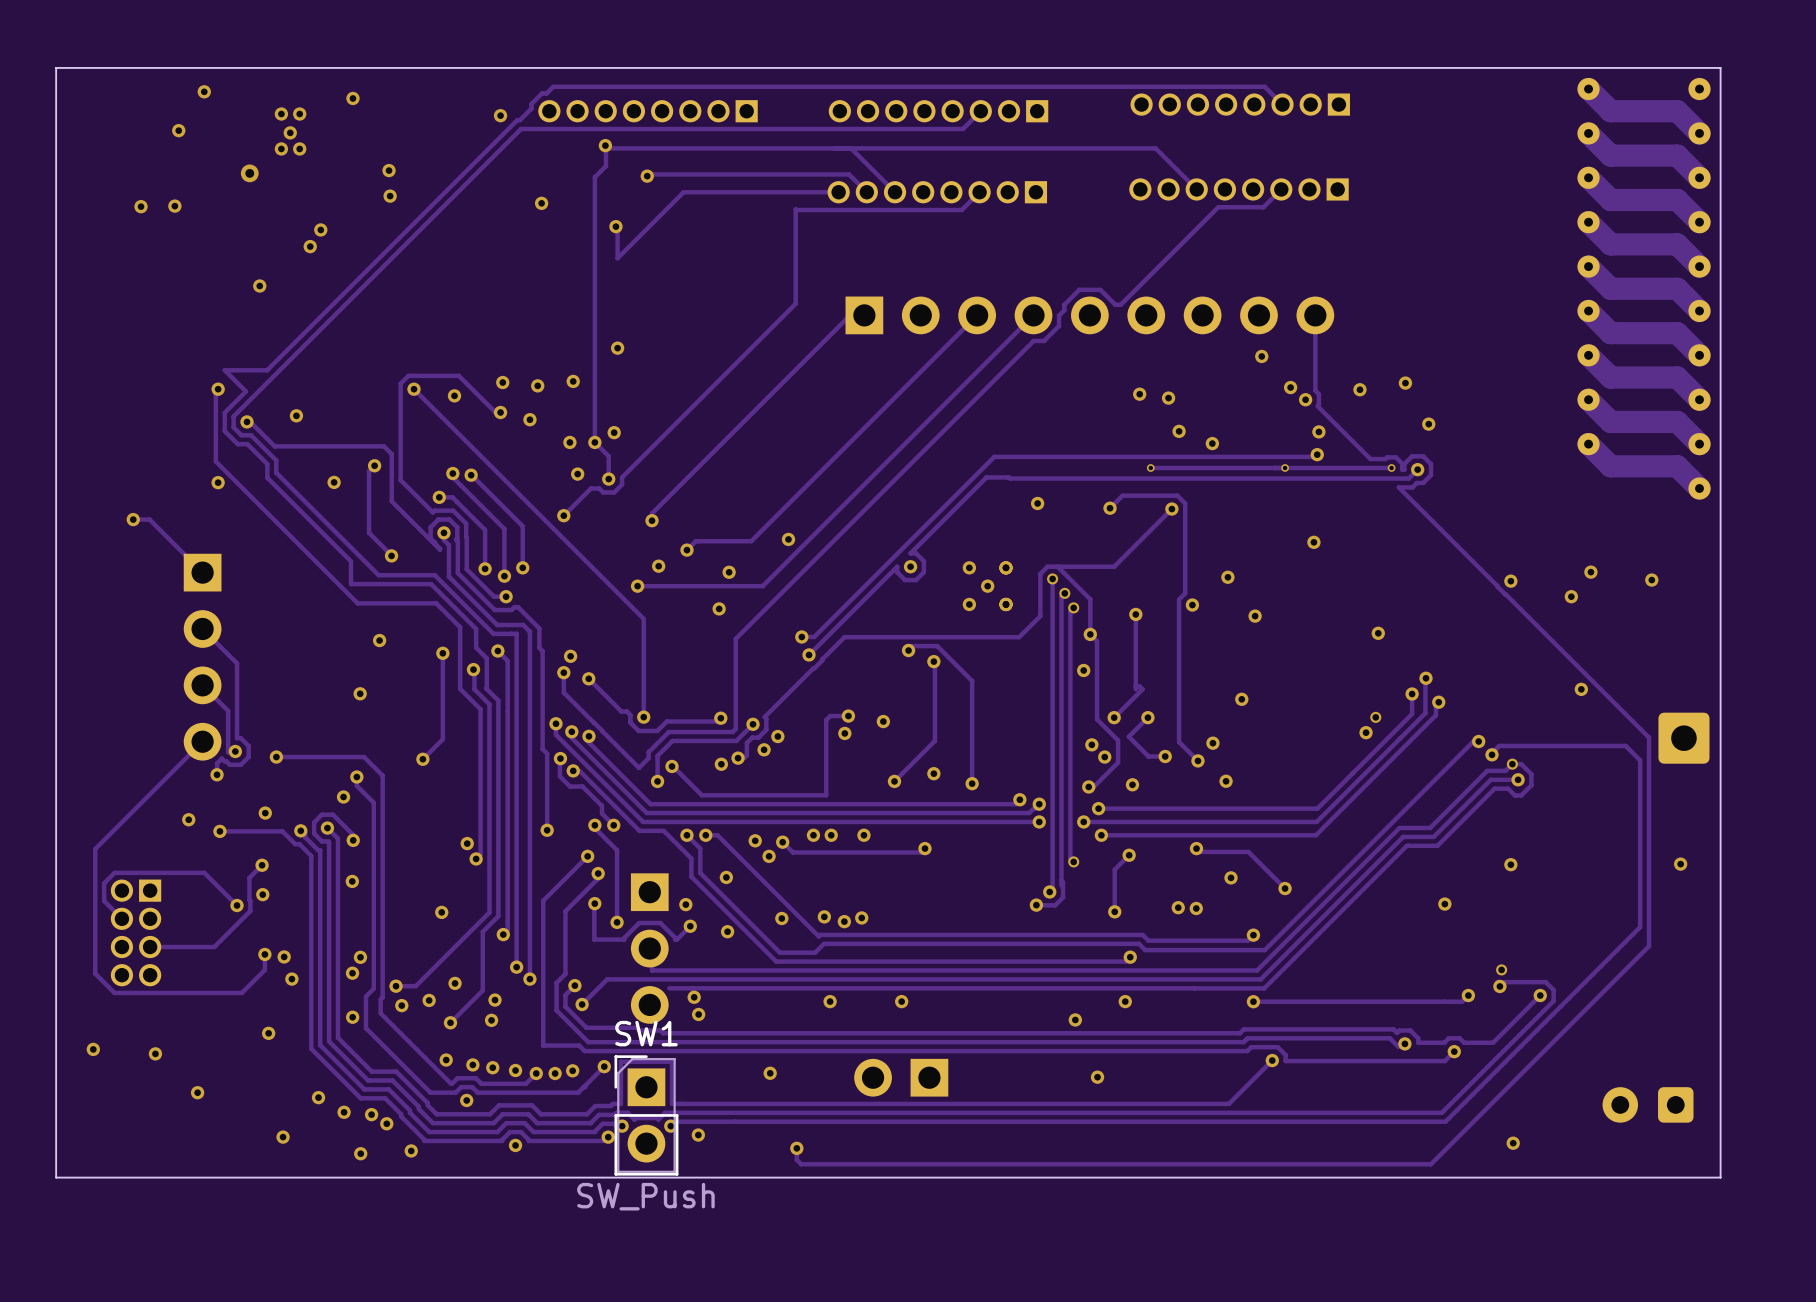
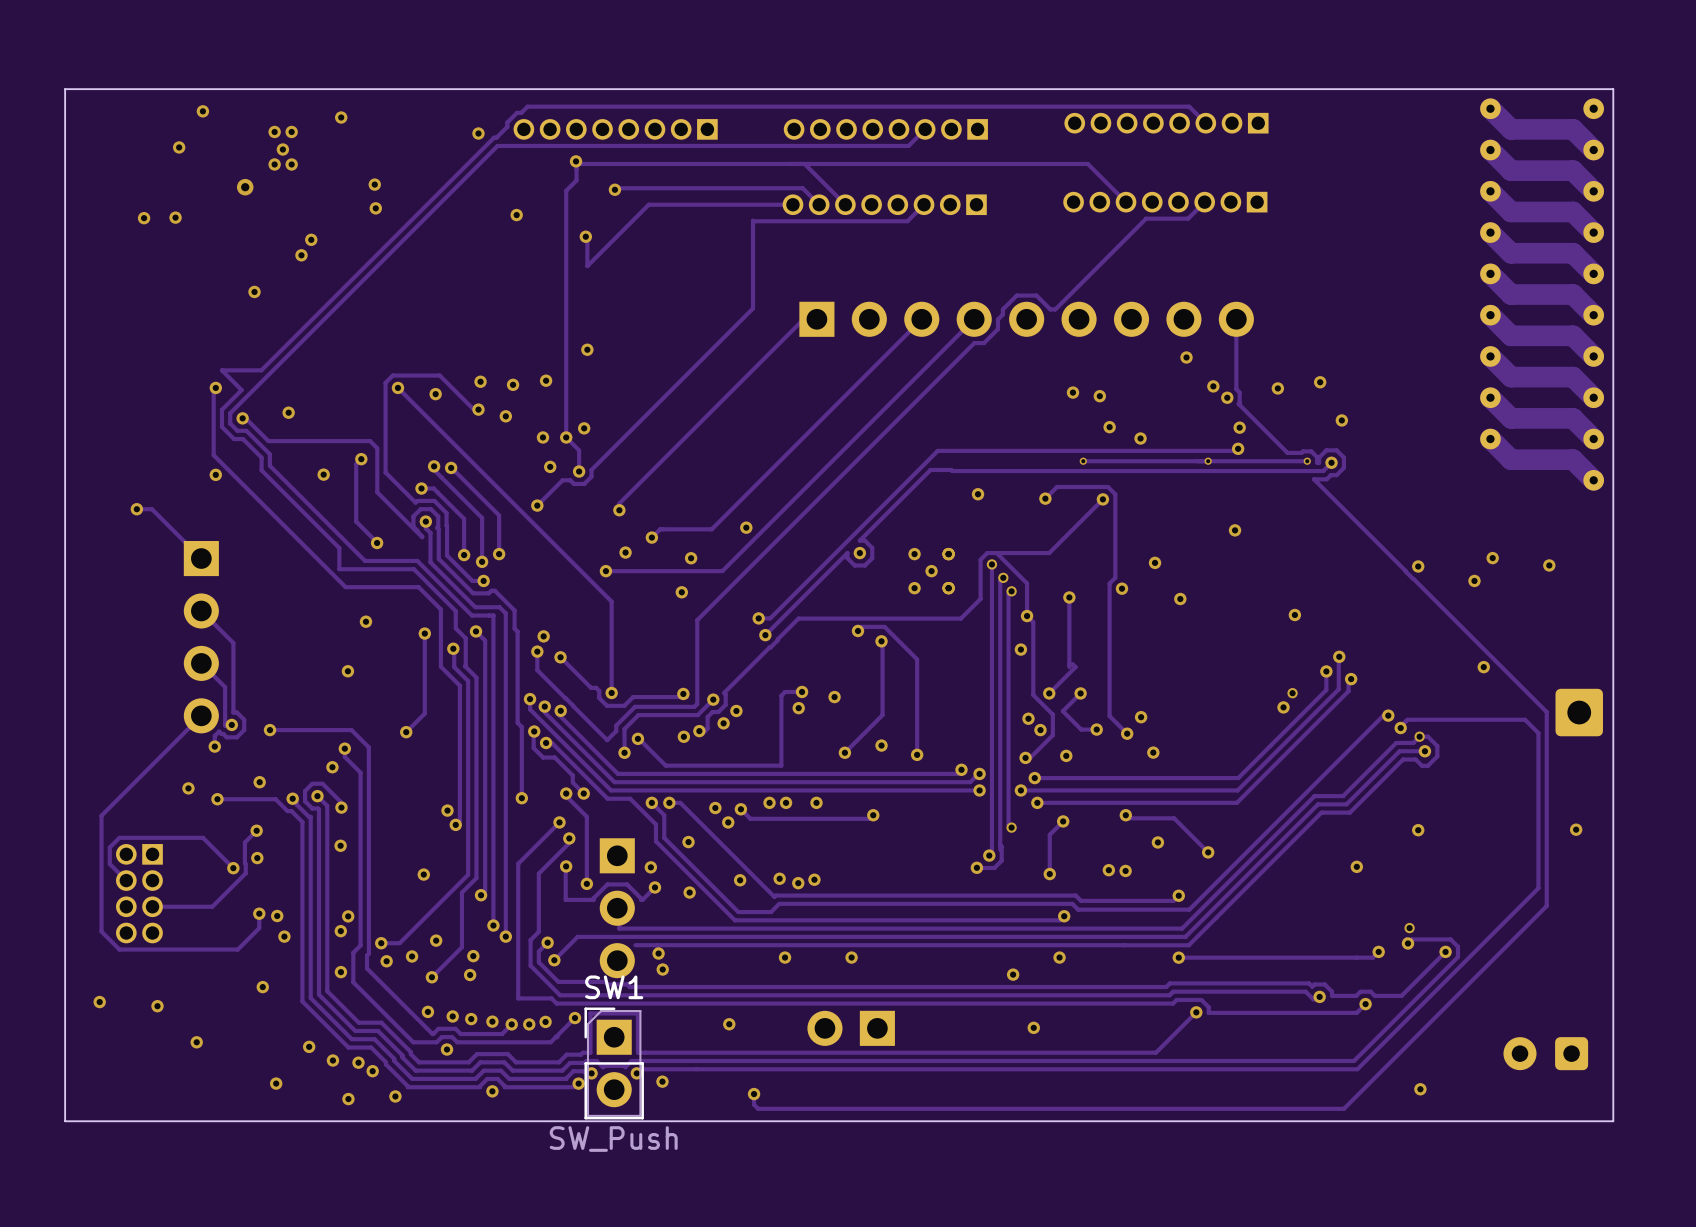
via: (1241, 699) -> none

